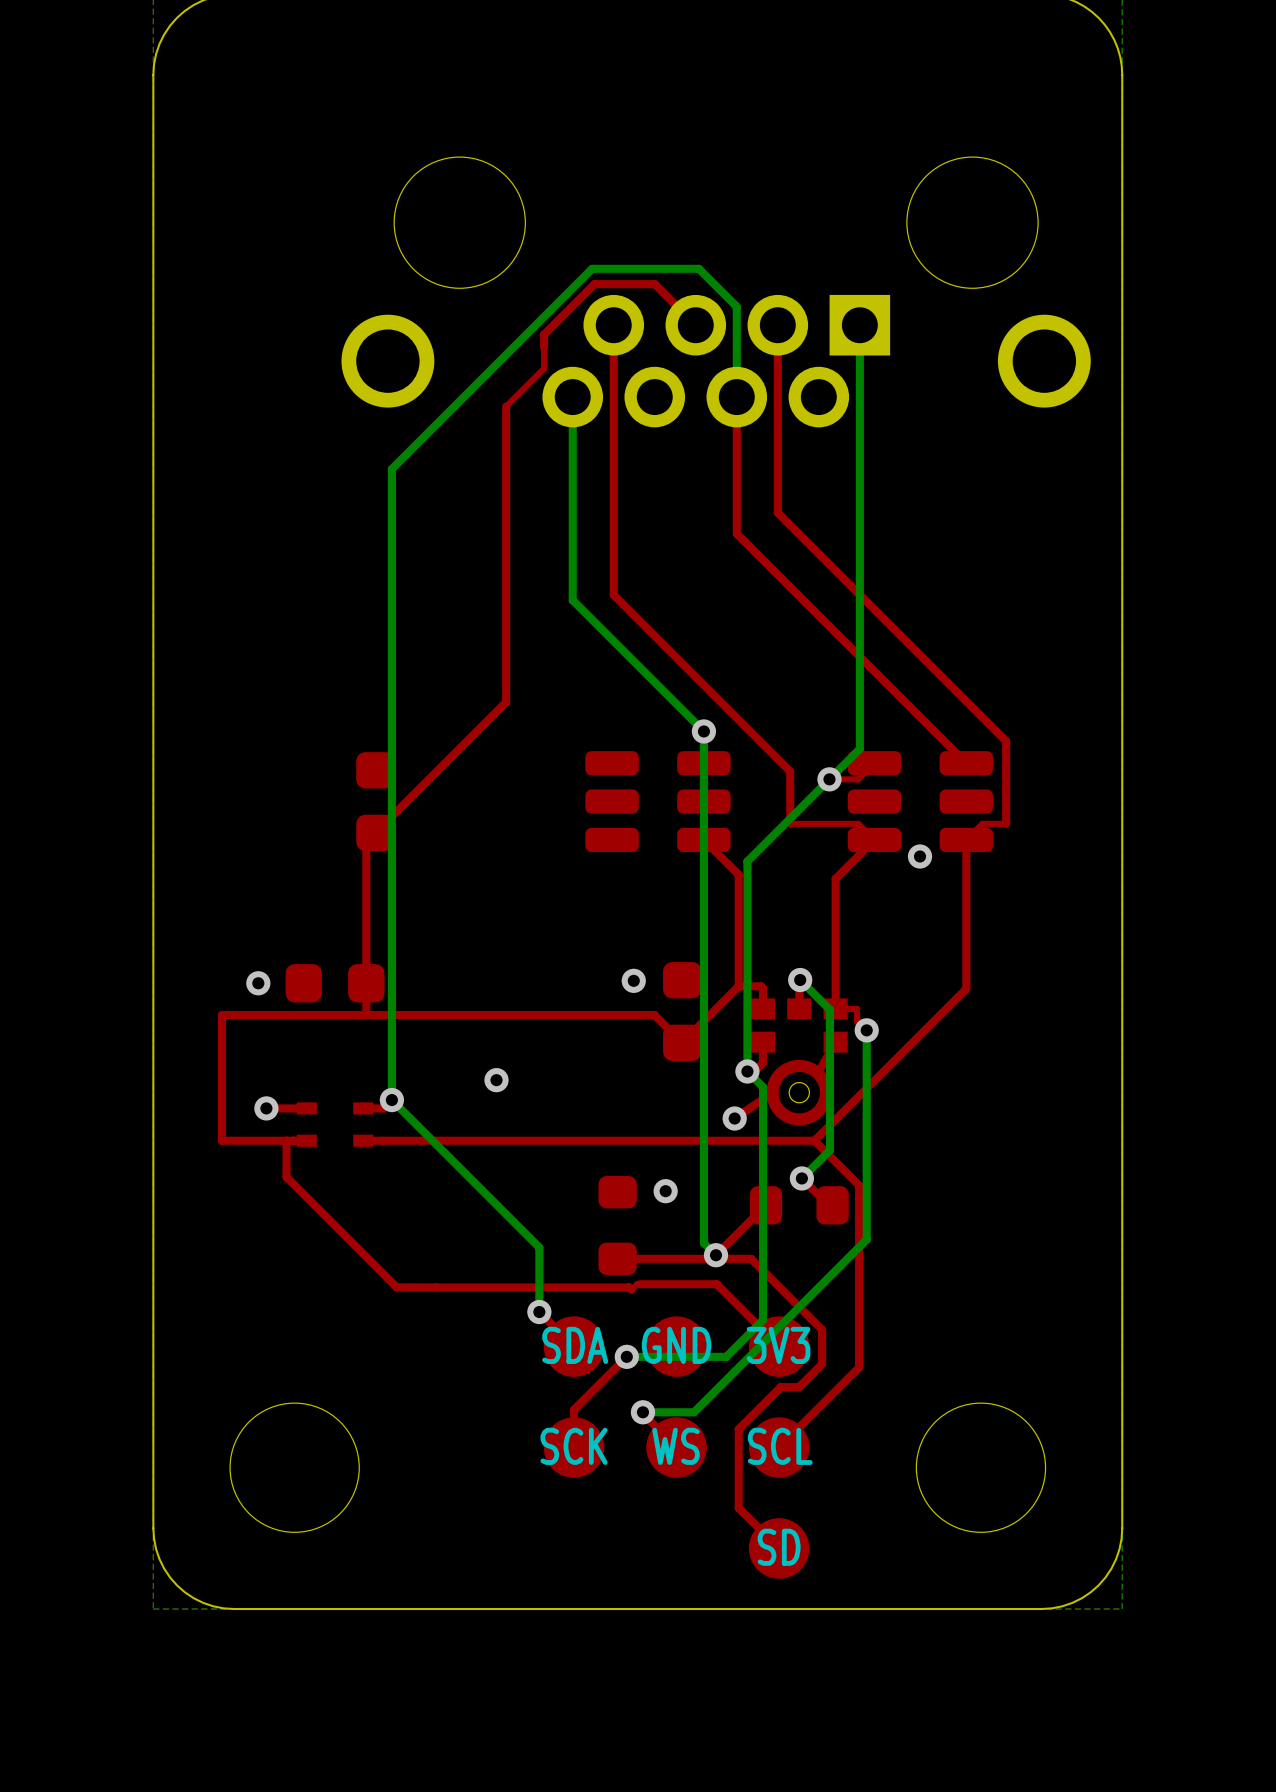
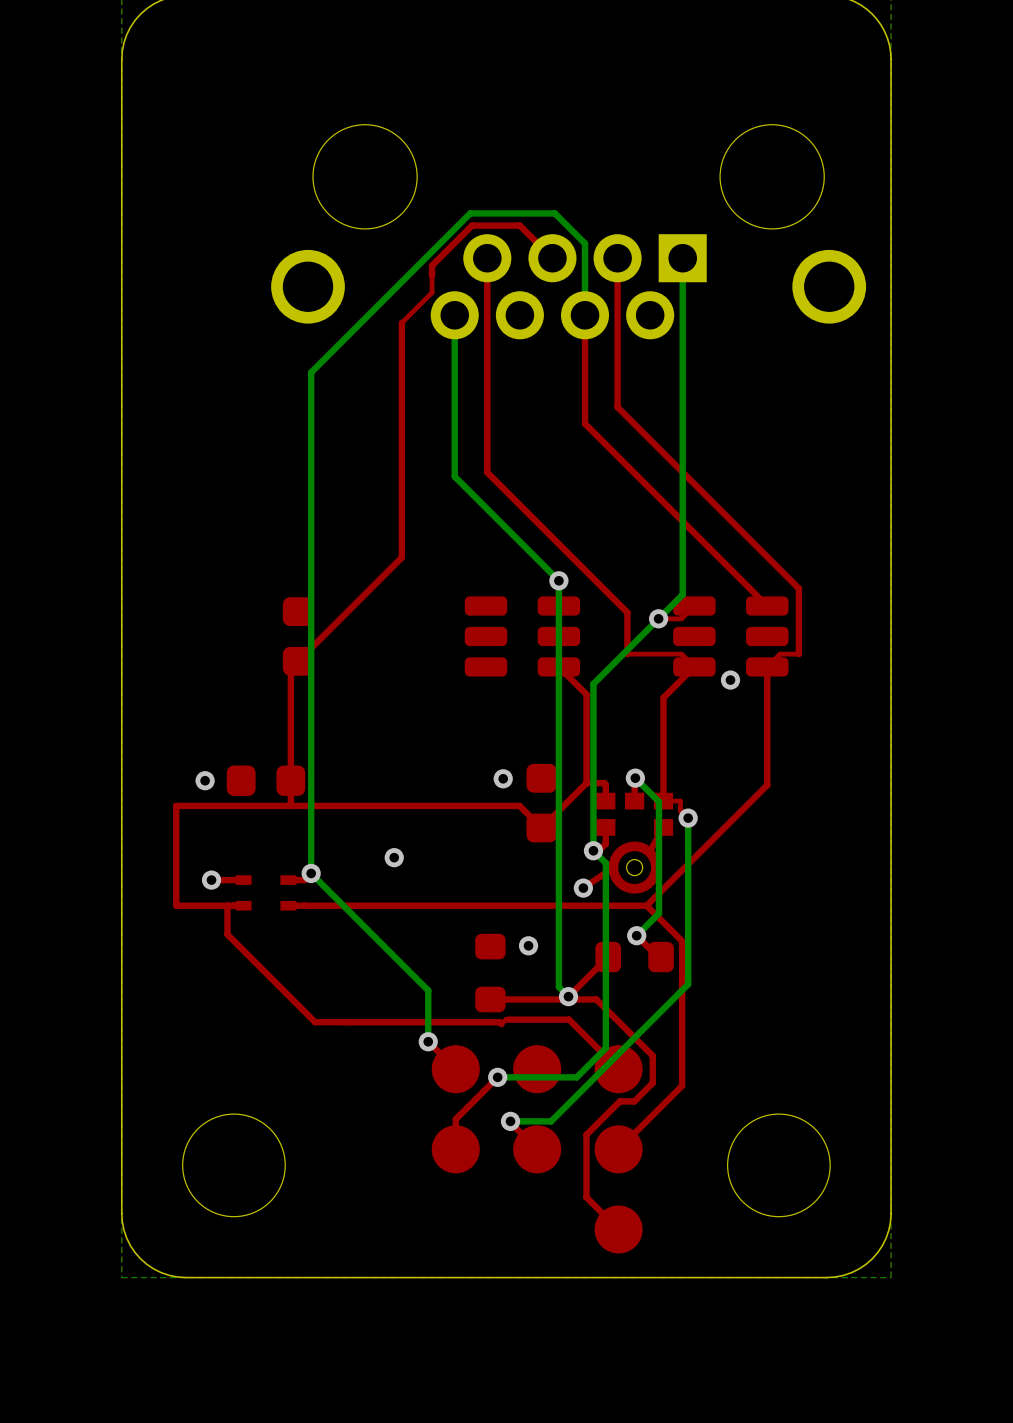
part value: SDA (575, 1345) -> none
part value: GND (676, 1345) -> none
part value: 3V3 (778, 1345) -> none
part value: SCK (574, 1446) -> none
part value: WS (675, 1446) -> none
part value: SCL (780, 1446) -> none
part value: SD (779, 1547) -> none

